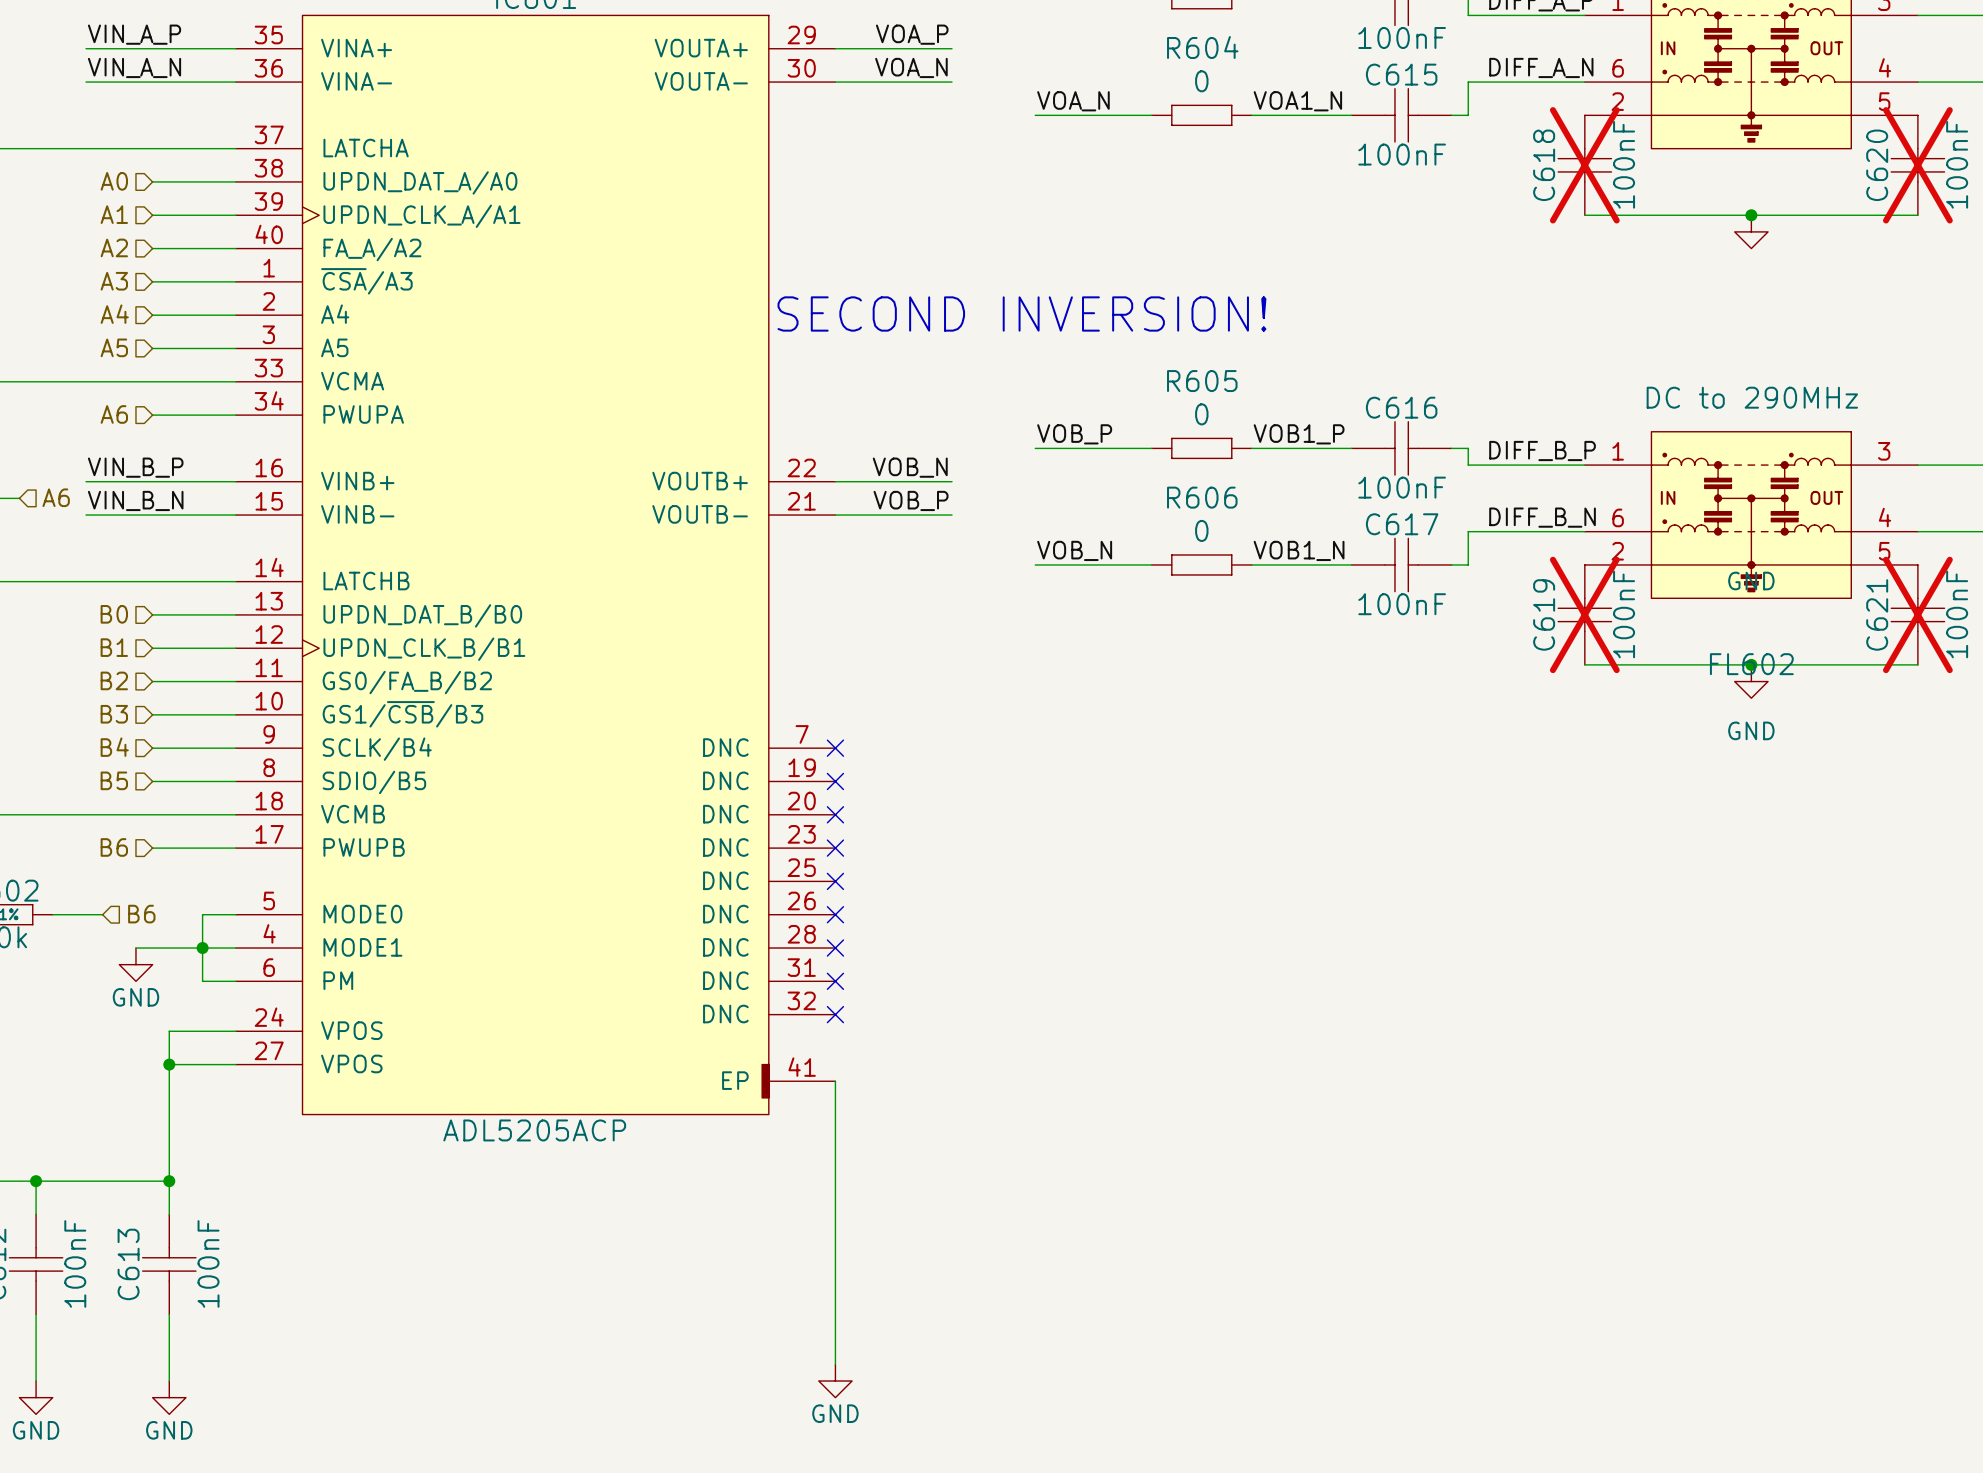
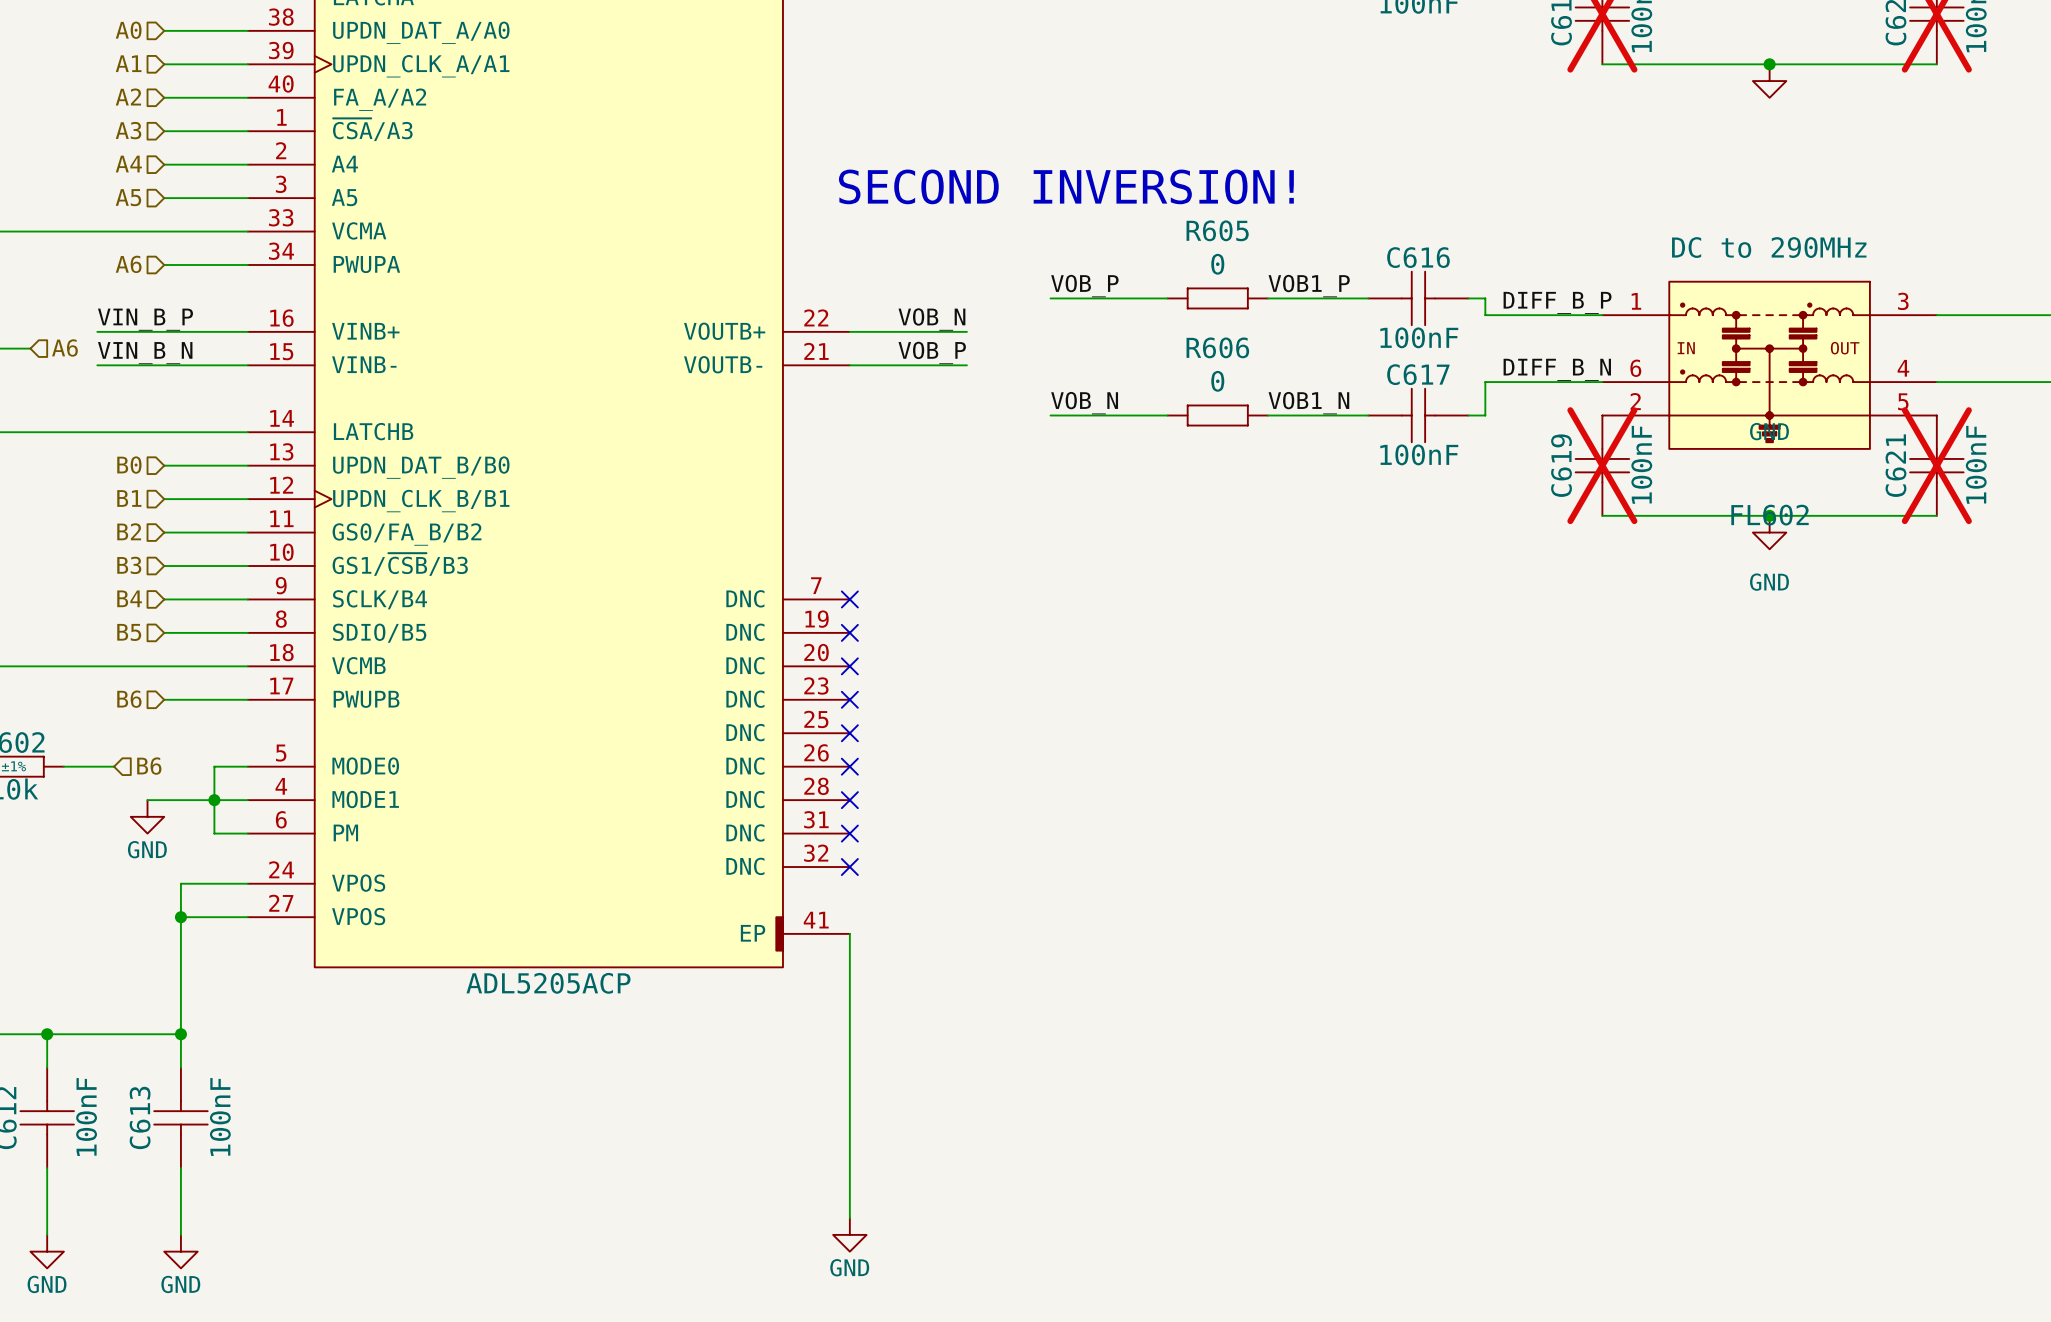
text position: SECOND INVERSION! (1021, 313) -> SECOND INVERSION! (1066, 186)

